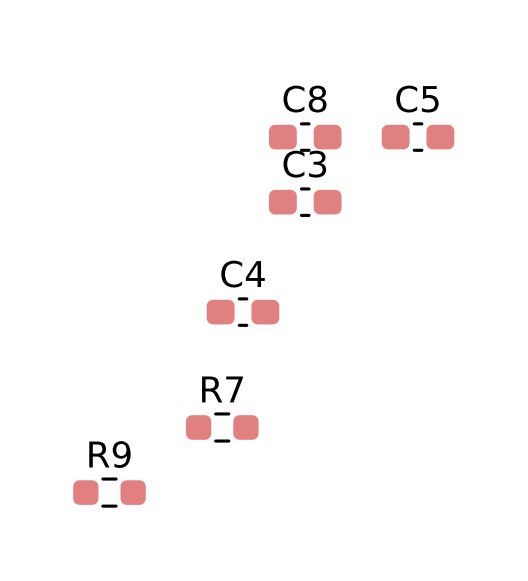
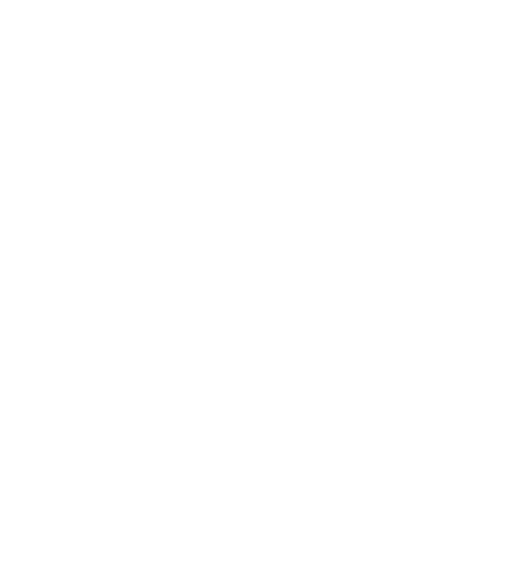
C8: (305, 137) -> none
C5: (418, 137) -> none
C3: (305, 202) -> none
C4: (243, 312) -> none
R7: (222, 427) -> none
R9: (109, 492) -> none

